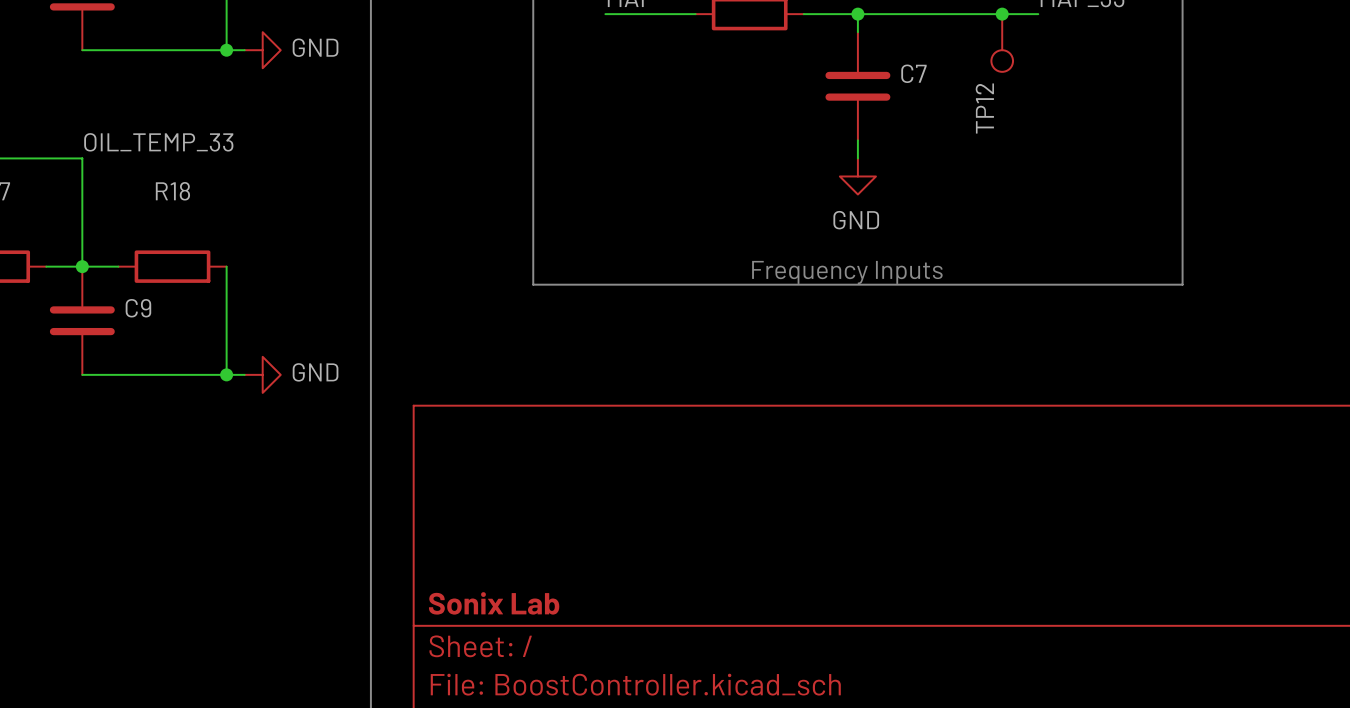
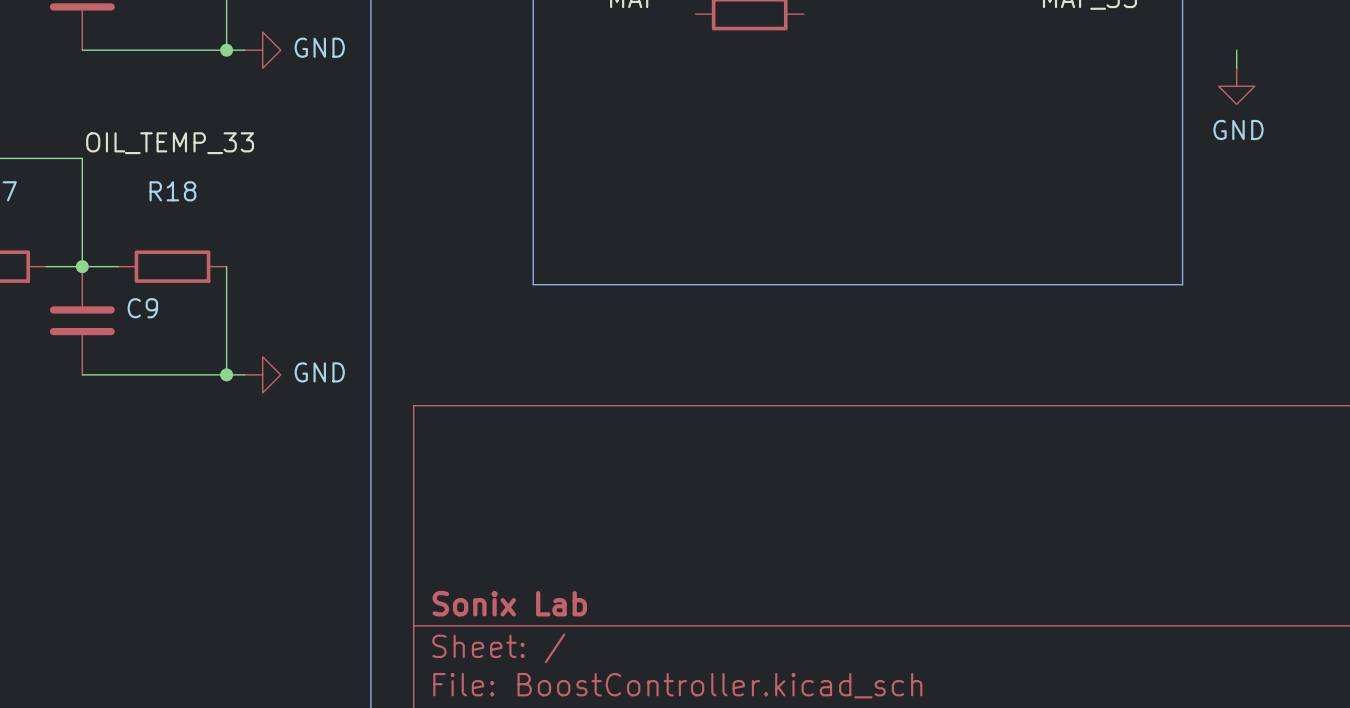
wire: (605, 14) (695, 14) -> none
wire: (803, 14) (1038, 14) -> none
wire: (857, 14) (857, 32) -> none
junction: (857, 14) -> none
junction: (1002, 14) -> none
TP12: (1002, 42) -> none
wire: none -> (1236, 50) (1236, 68)
C7: (857, 86) -> none
power symbol: none -> GND (1236, 86)
wire: (857, 140) (857, 158) -> none
power symbol: GND (857, 176) -> none
text: Frequency Inputs (847, 272) -> none

